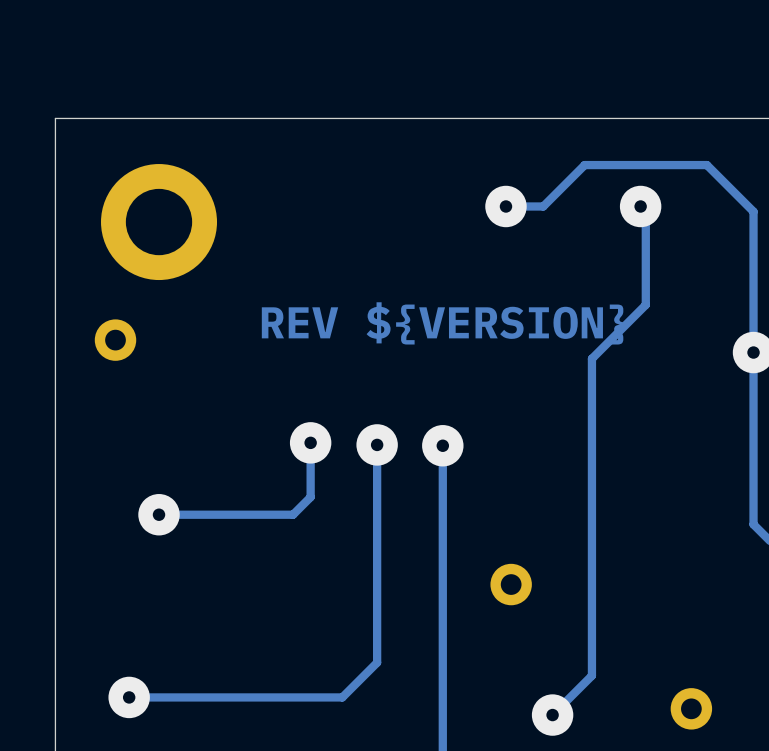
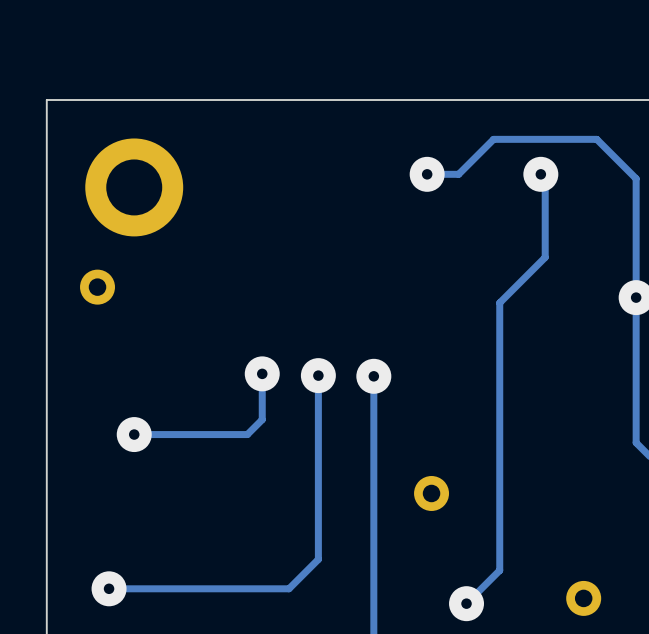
text: REV ${VERSION} (445, 323) -> none

